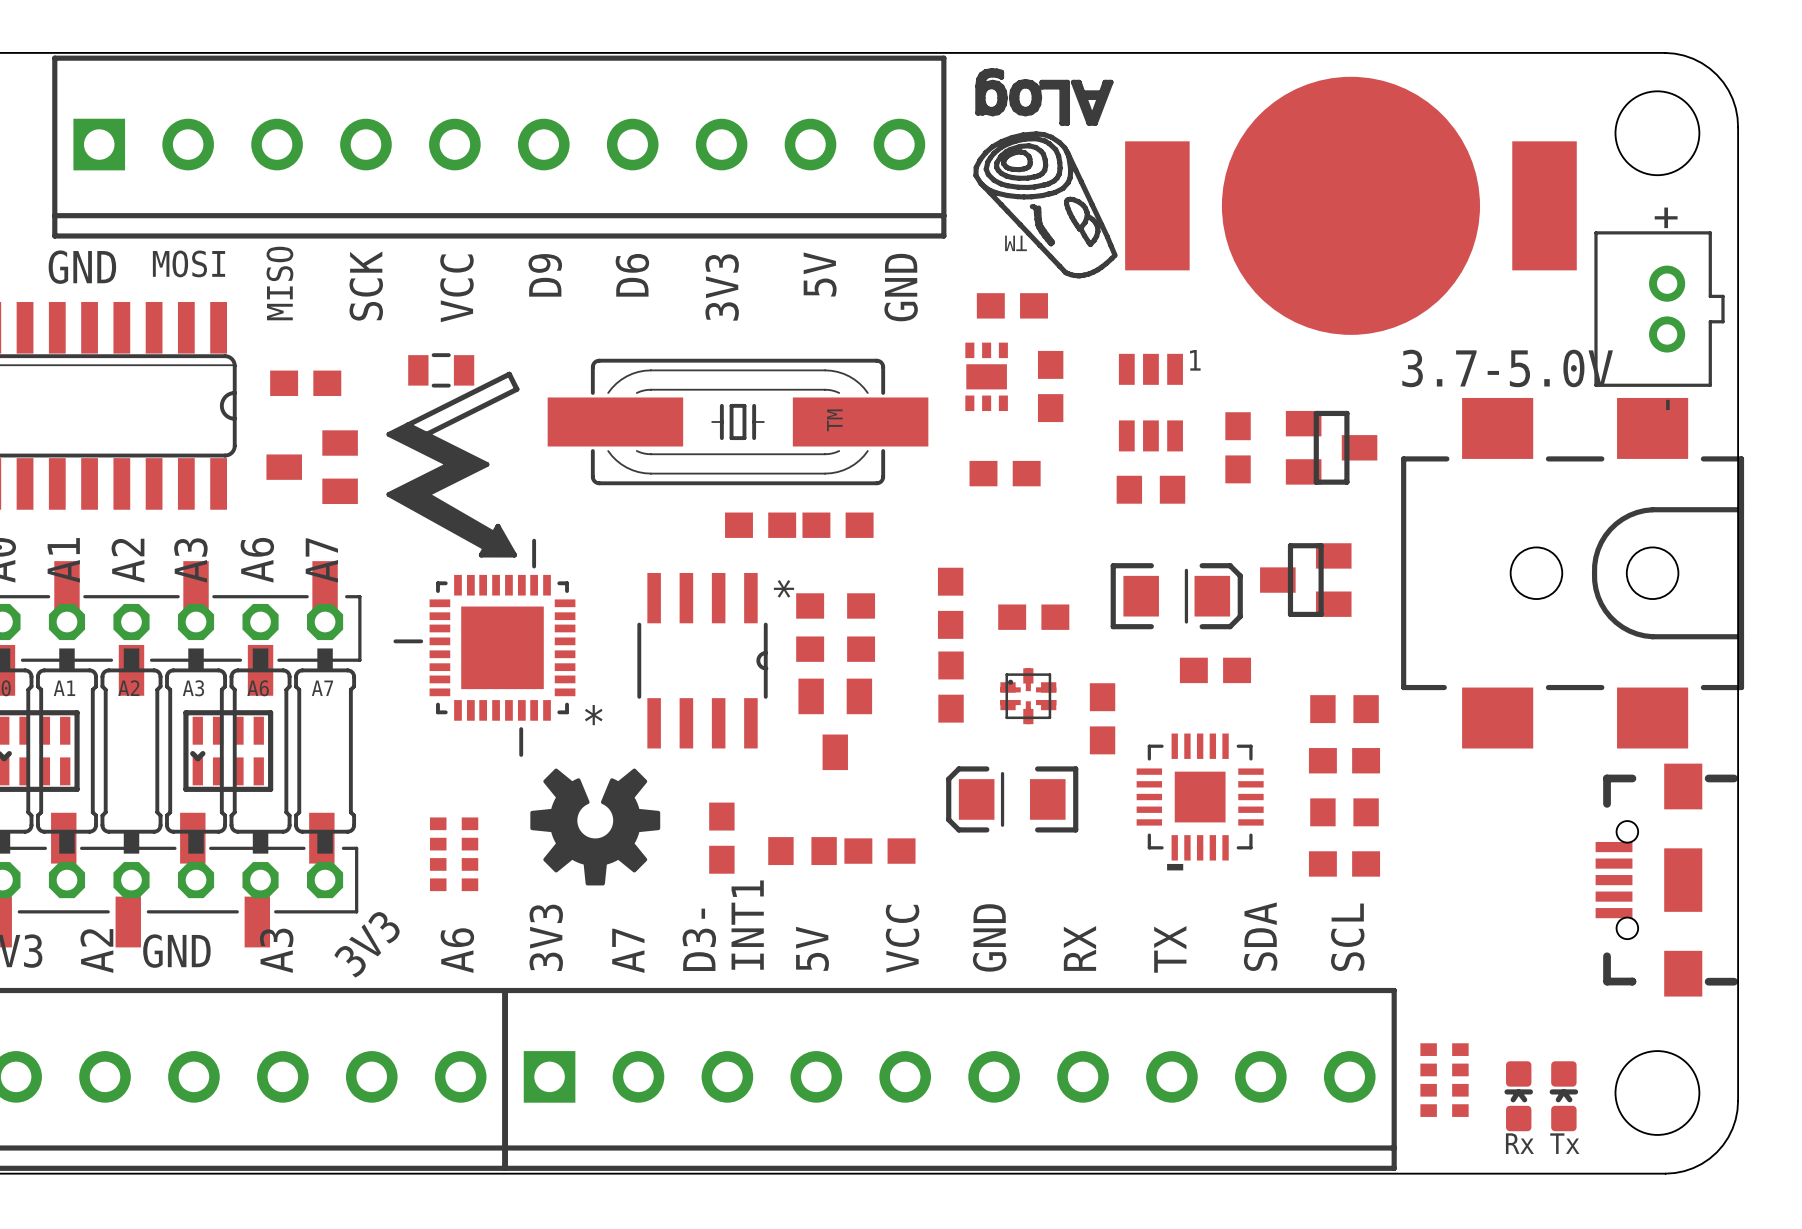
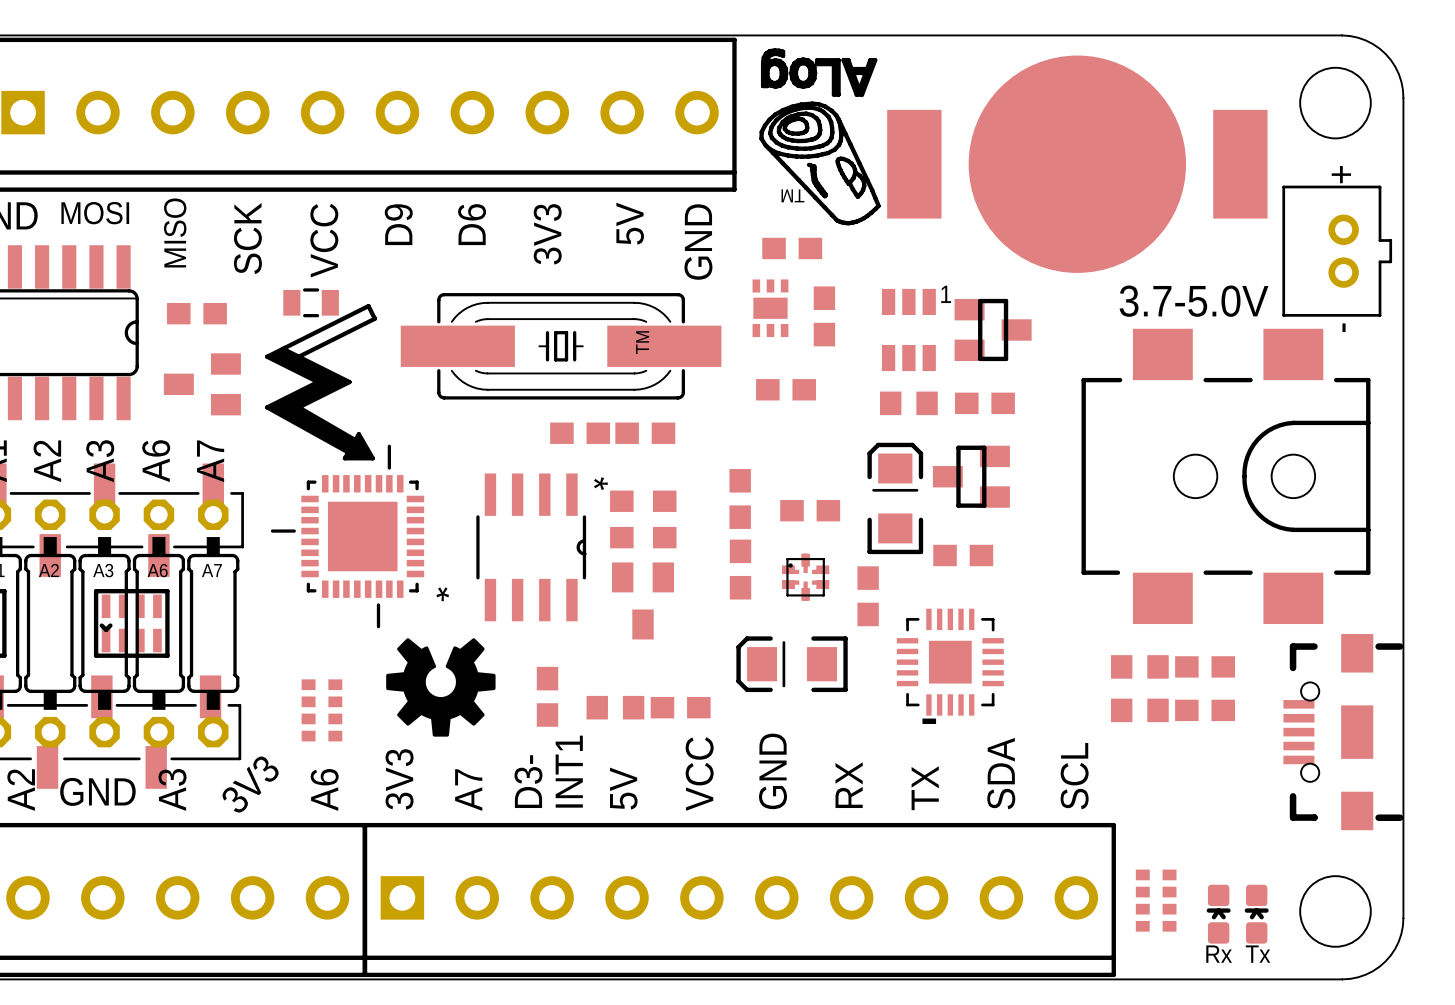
part: none -> (993, 329)
part rotation: 0° (1238, 447) -> 90° clockwise (984, 403)
part: (1331, 447) -> none
part position: (1572, 573) -> (1225, 476)
part position: (1305, 580) -> (971, 476)
part rotation: 0° (1176, 596) -> 90° counterclockwise (895, 498)
part: (1344, 709) -> none
part: (1344, 760) -> none
part: none -> (1139, 666)
part: none -> (1205, 666)
part: (1344, 812) -> none
part: none -> (1139, 710)
part: none -> (1205, 710)
part: (1344, 863) -> none

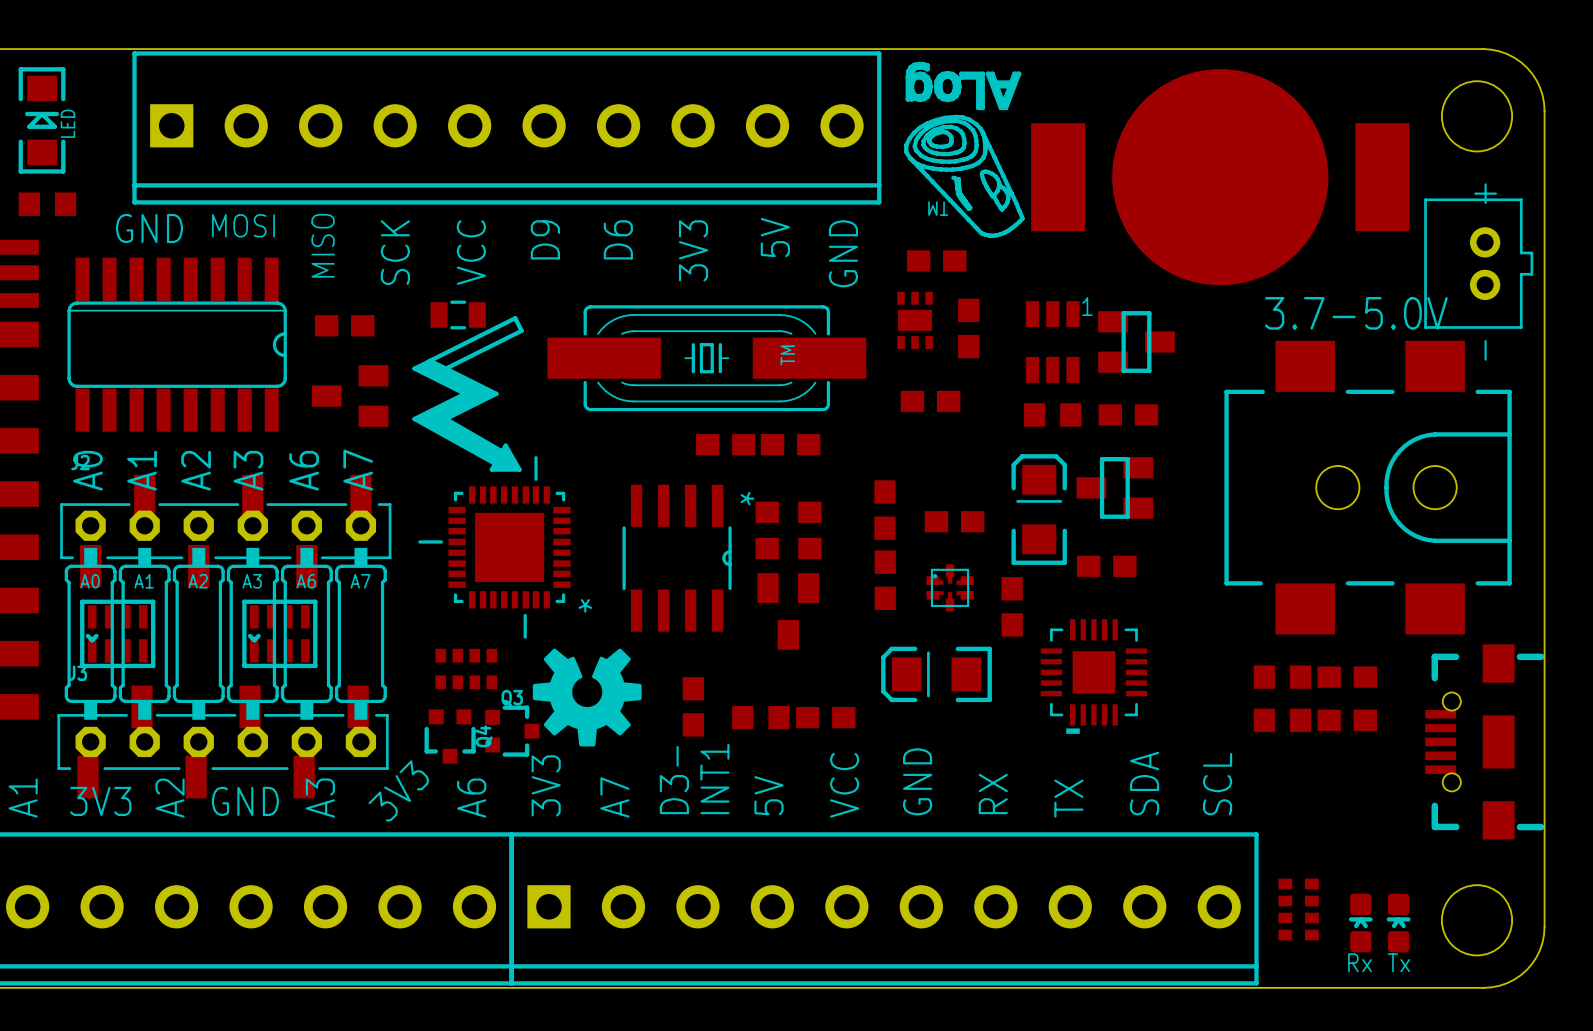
part rotation: 0° (321, 710) -> 90° clockwise (466, 668)
part position: (321, 710) -> (466, 668)
Q3: none -> (512, 731)
Q4: none -> (450, 736)

